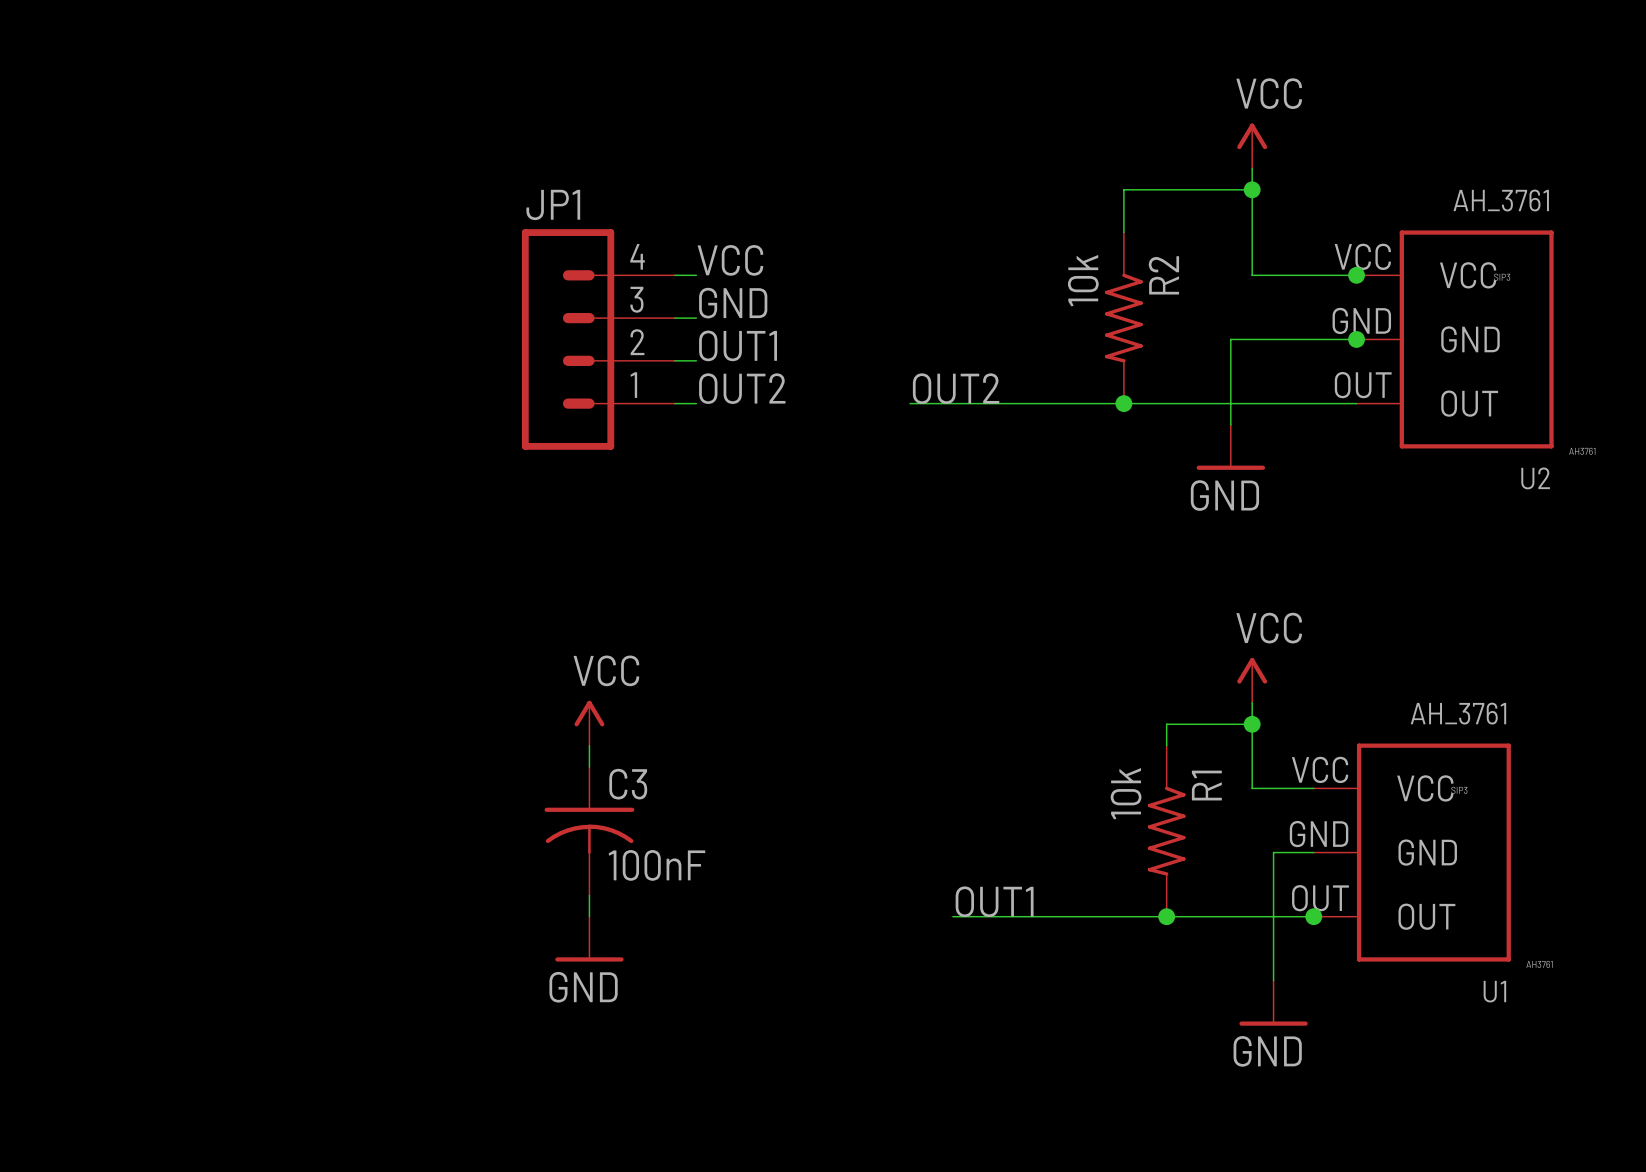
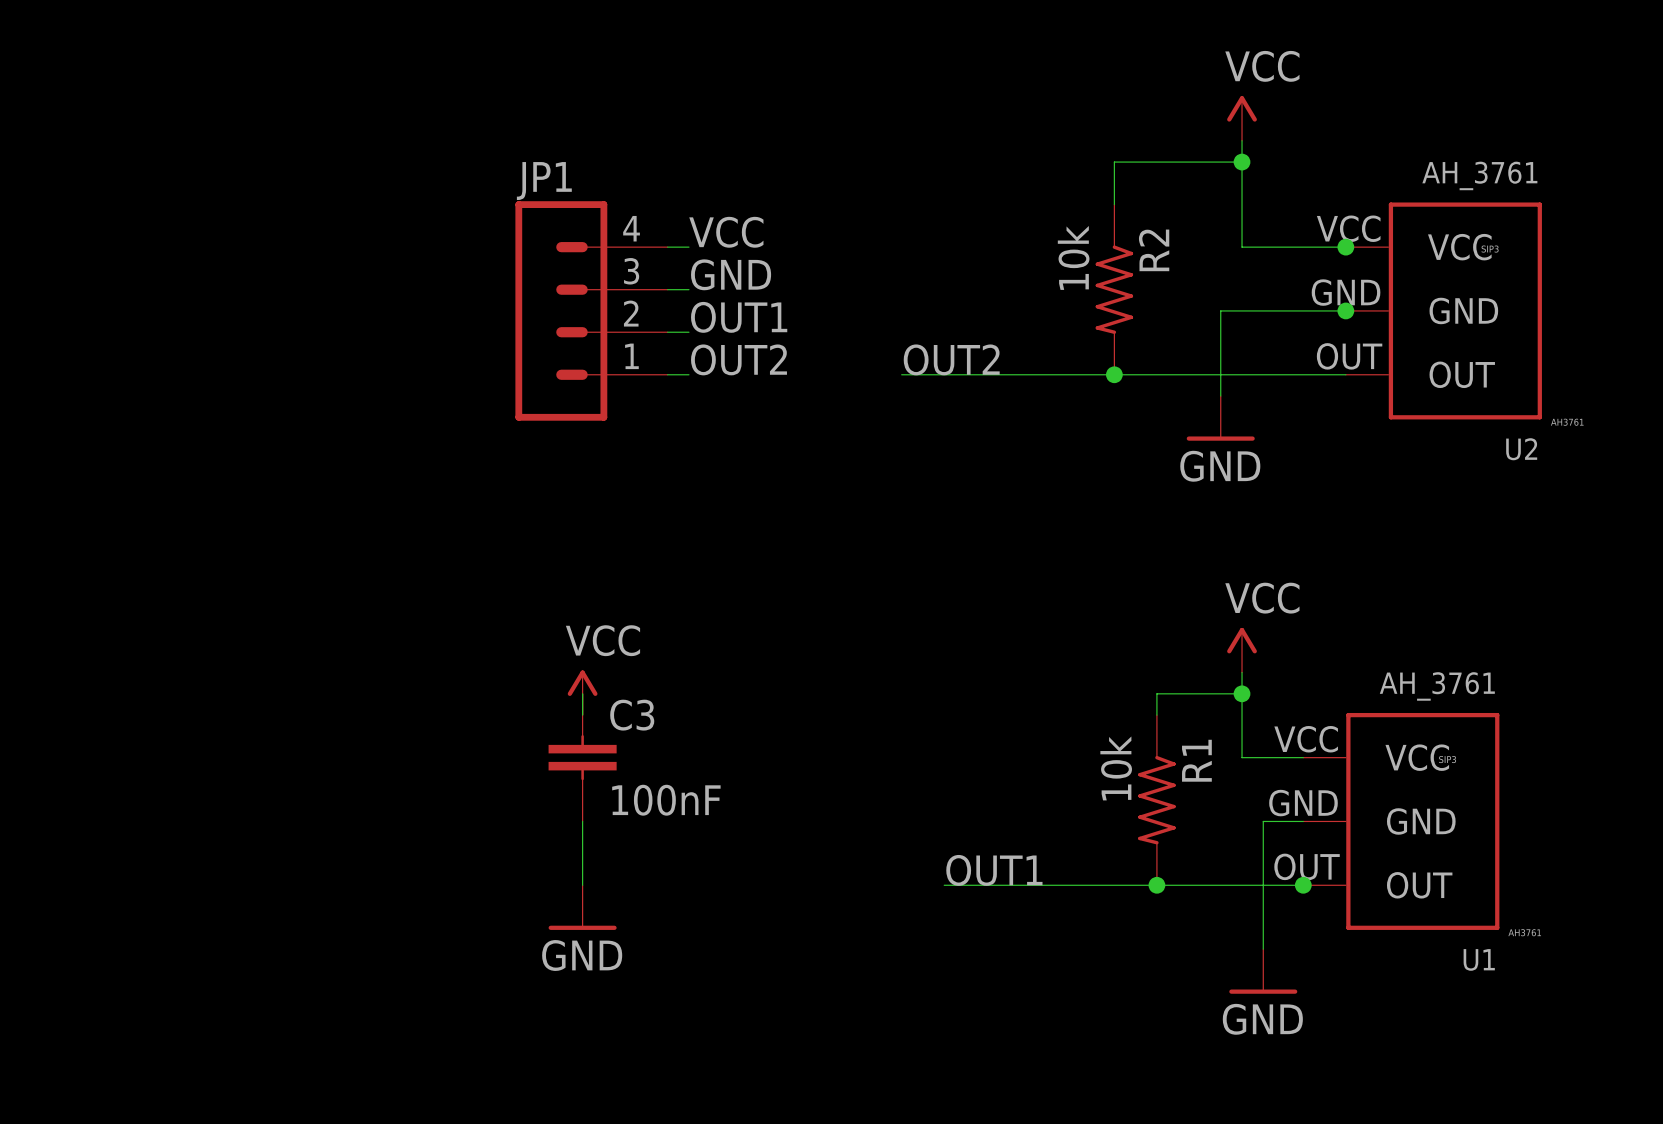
C3 symbol: [544, 767, 635, 896] -> [548, 693, 617, 822]

